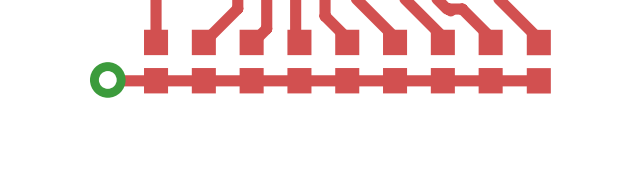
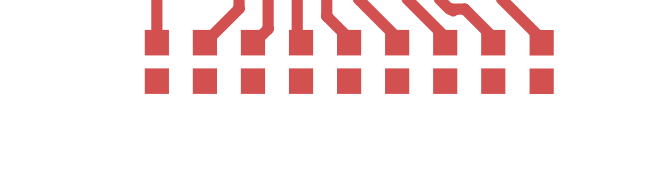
top track: (107, 79) (538, 80) -> none
via: (107, 79) -> none

